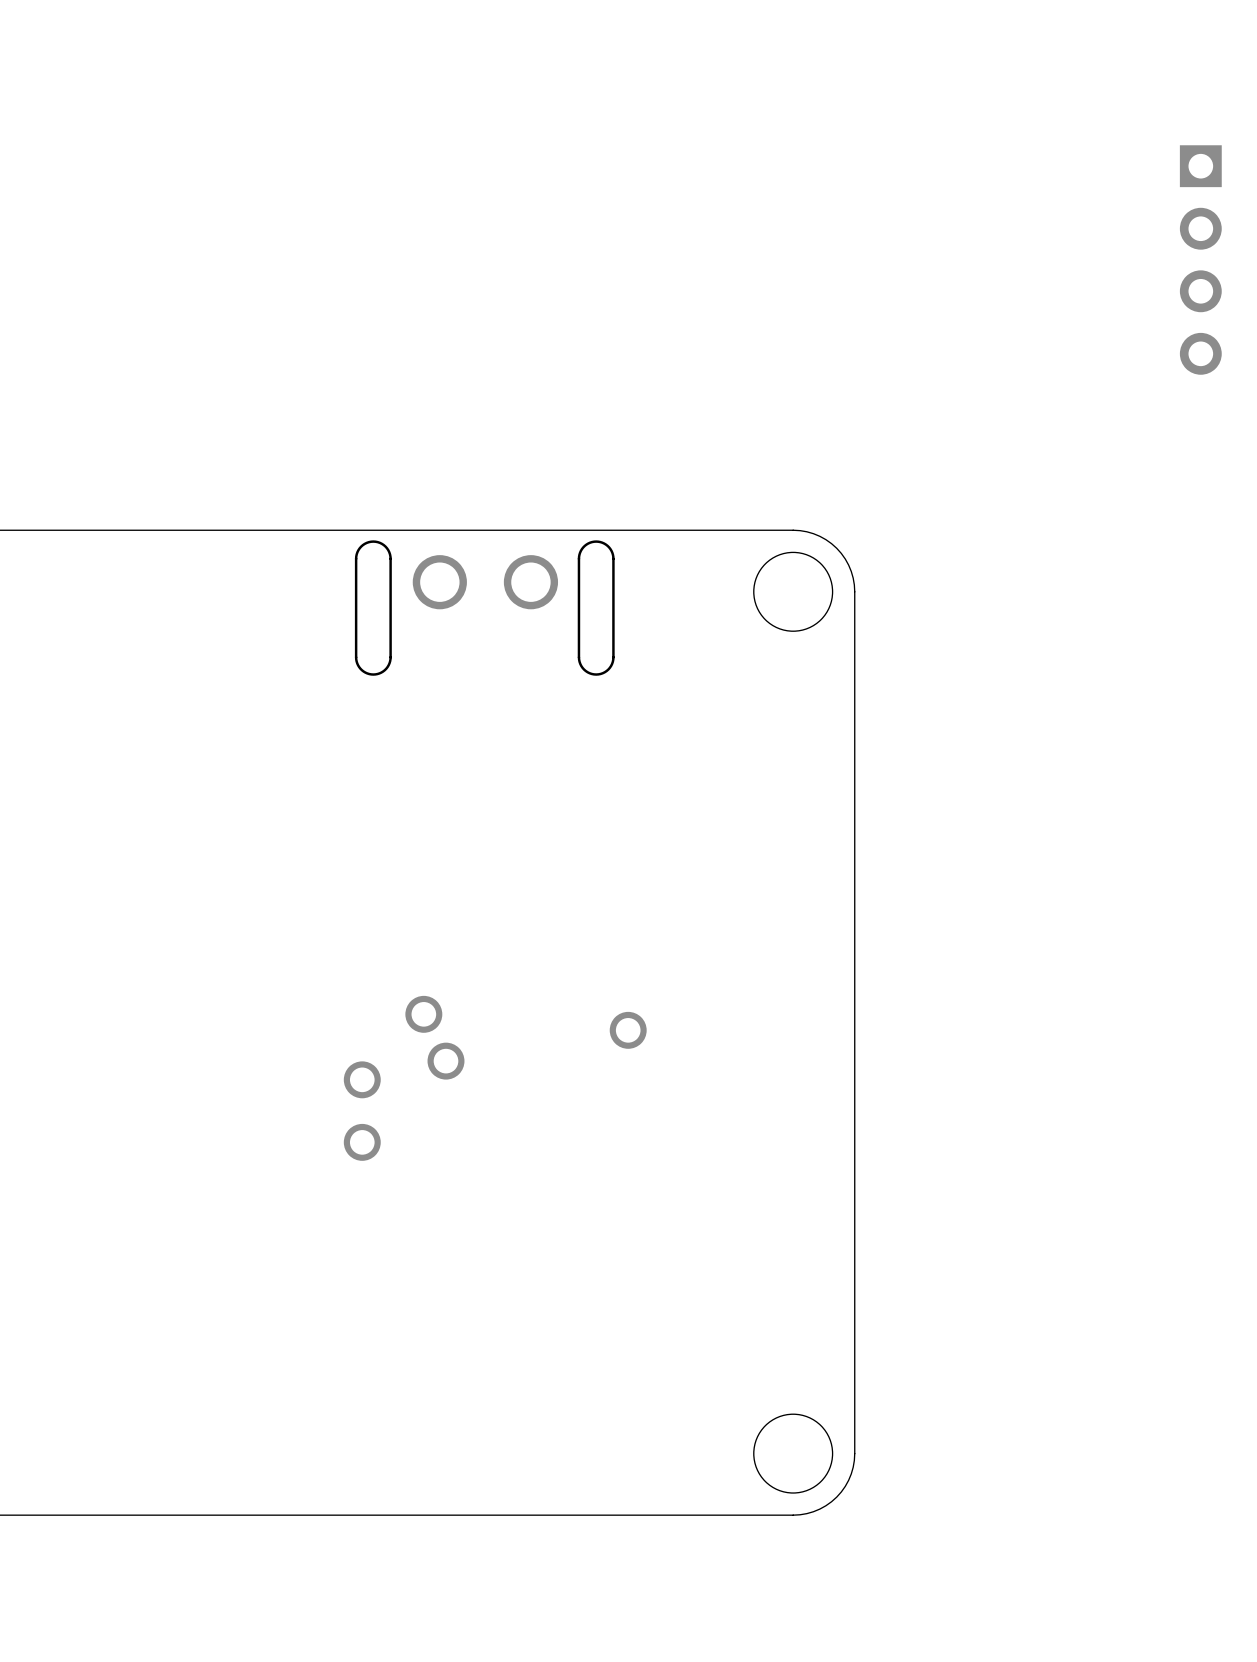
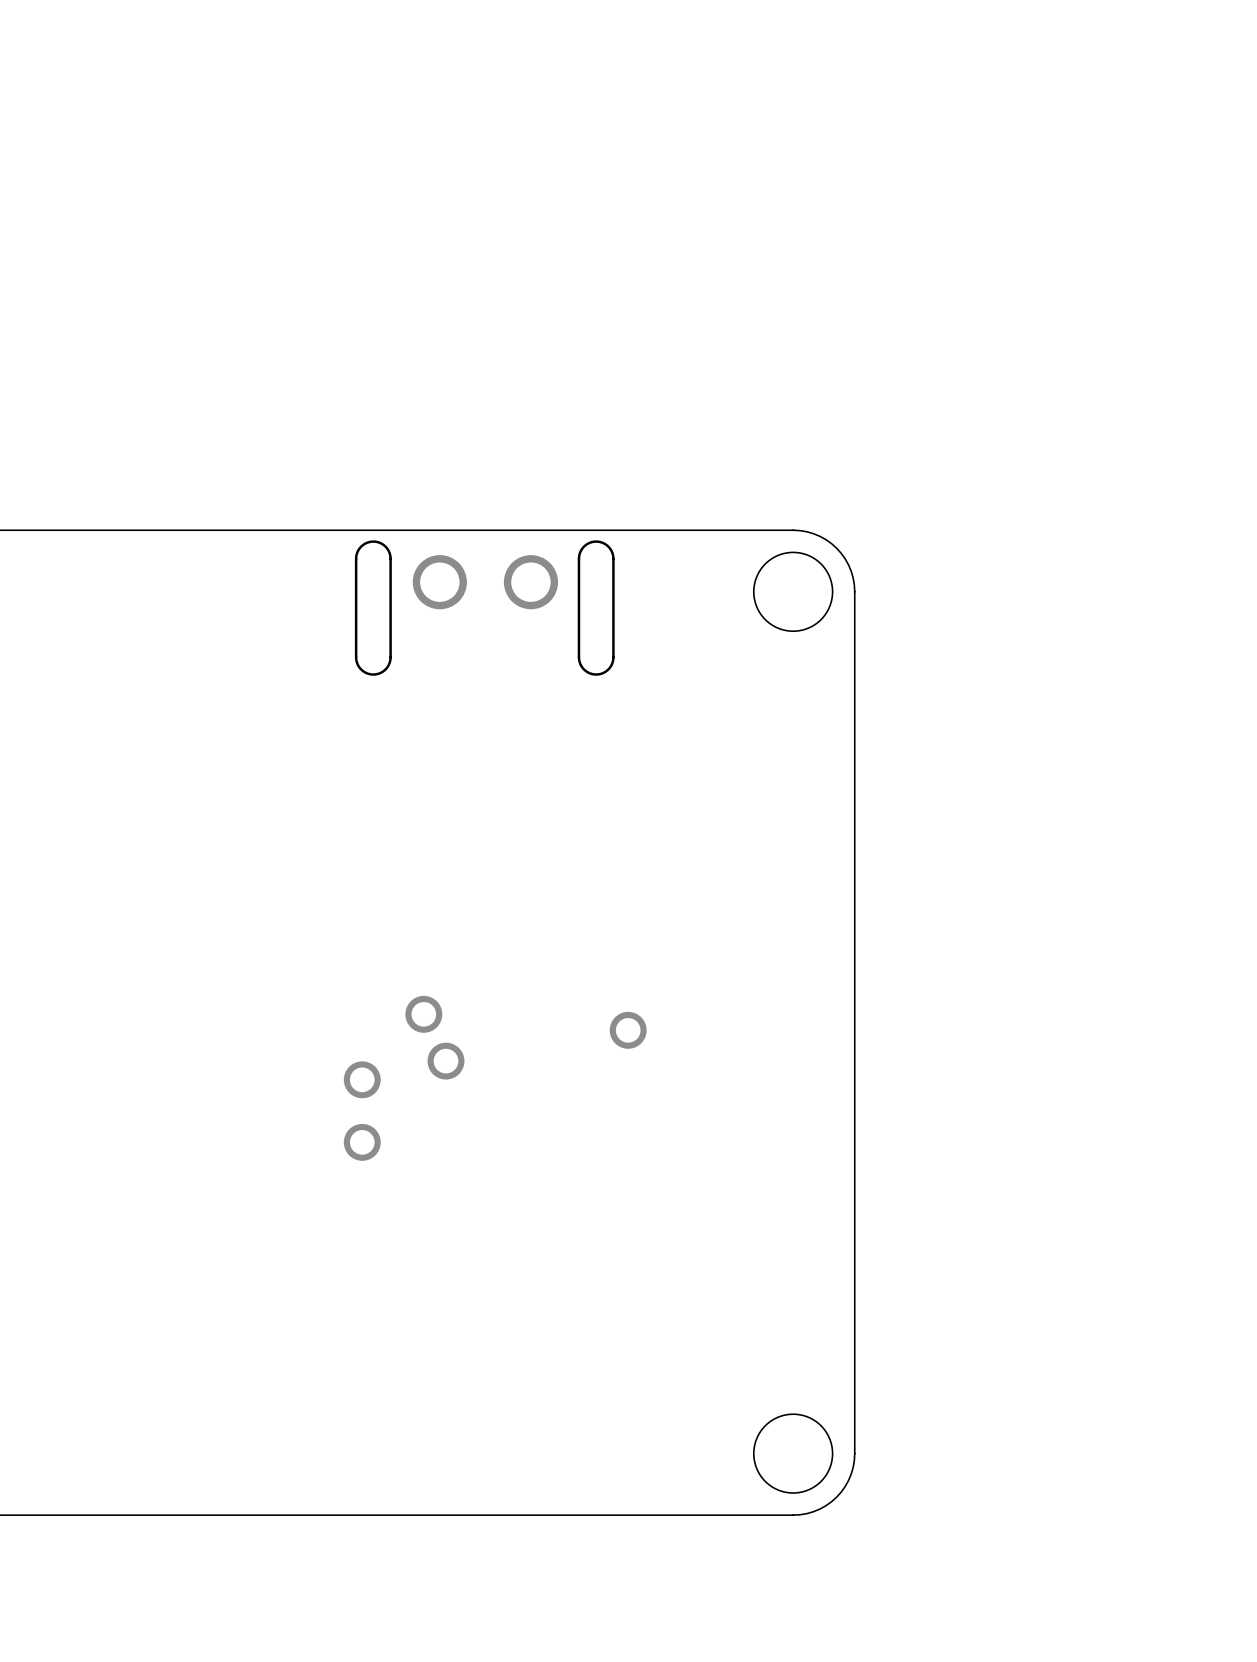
part: (1200, 260) -> none

